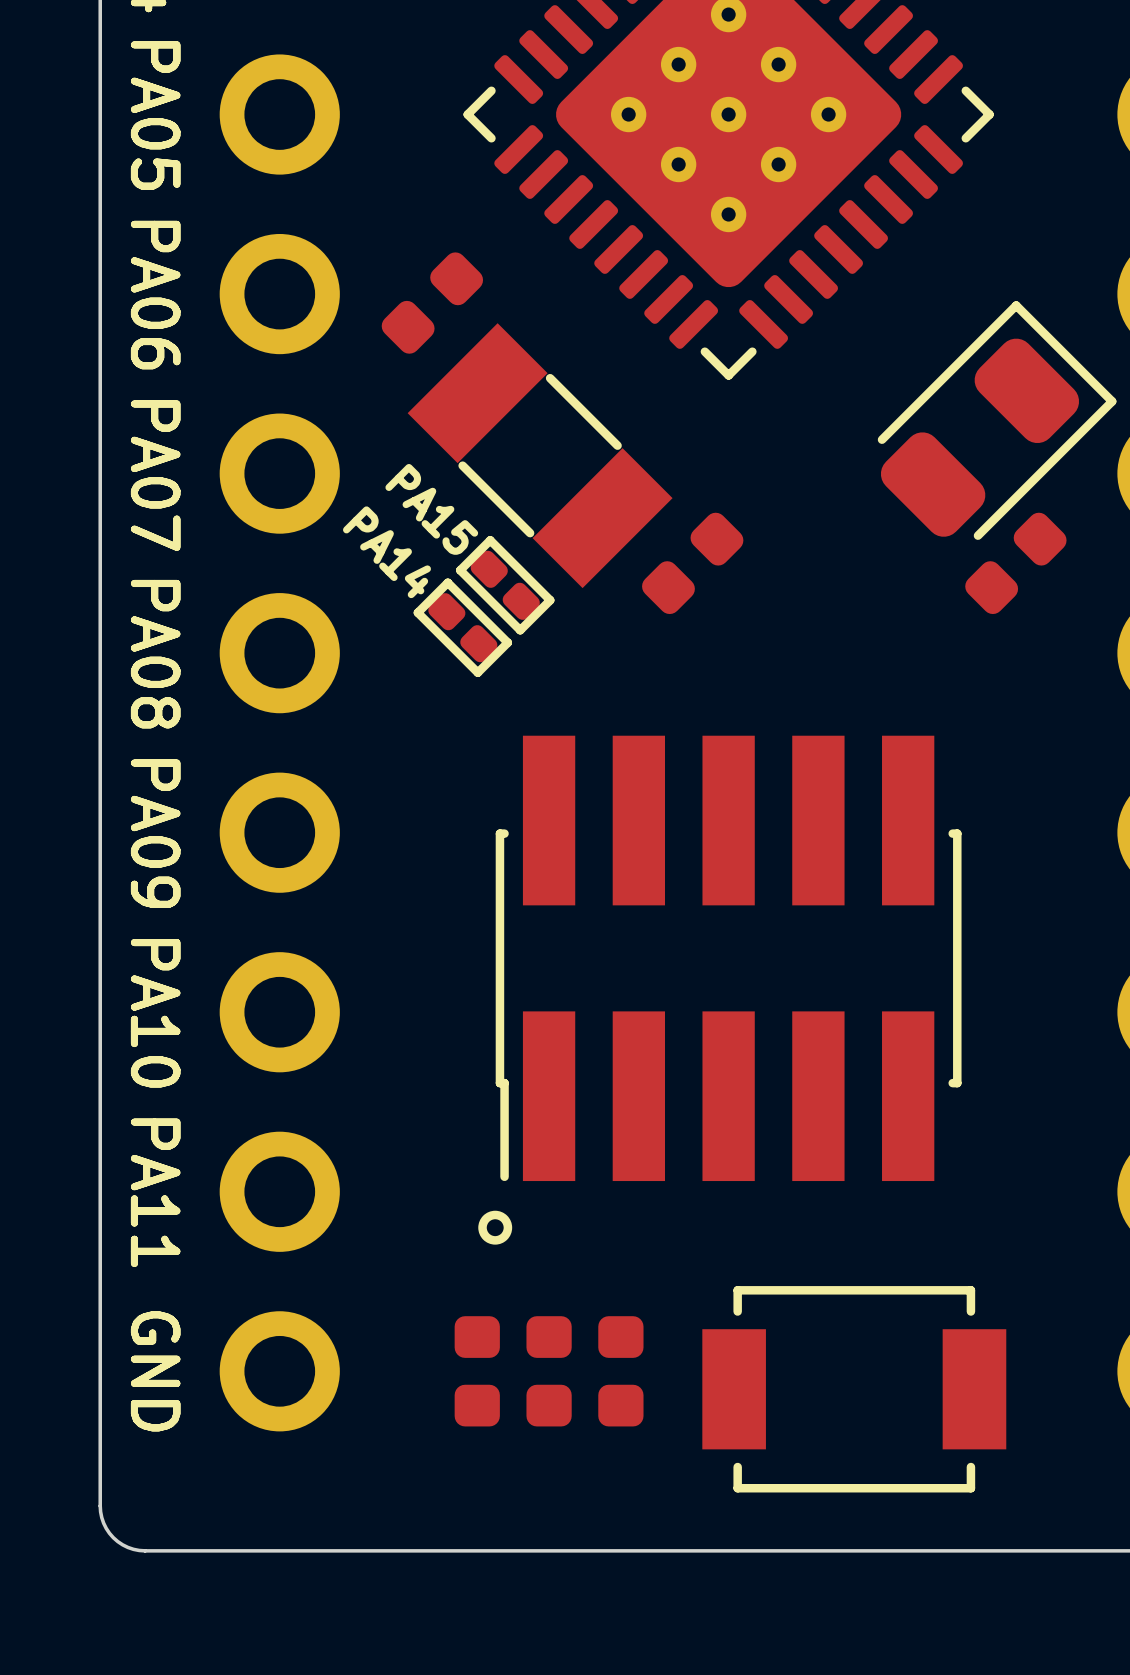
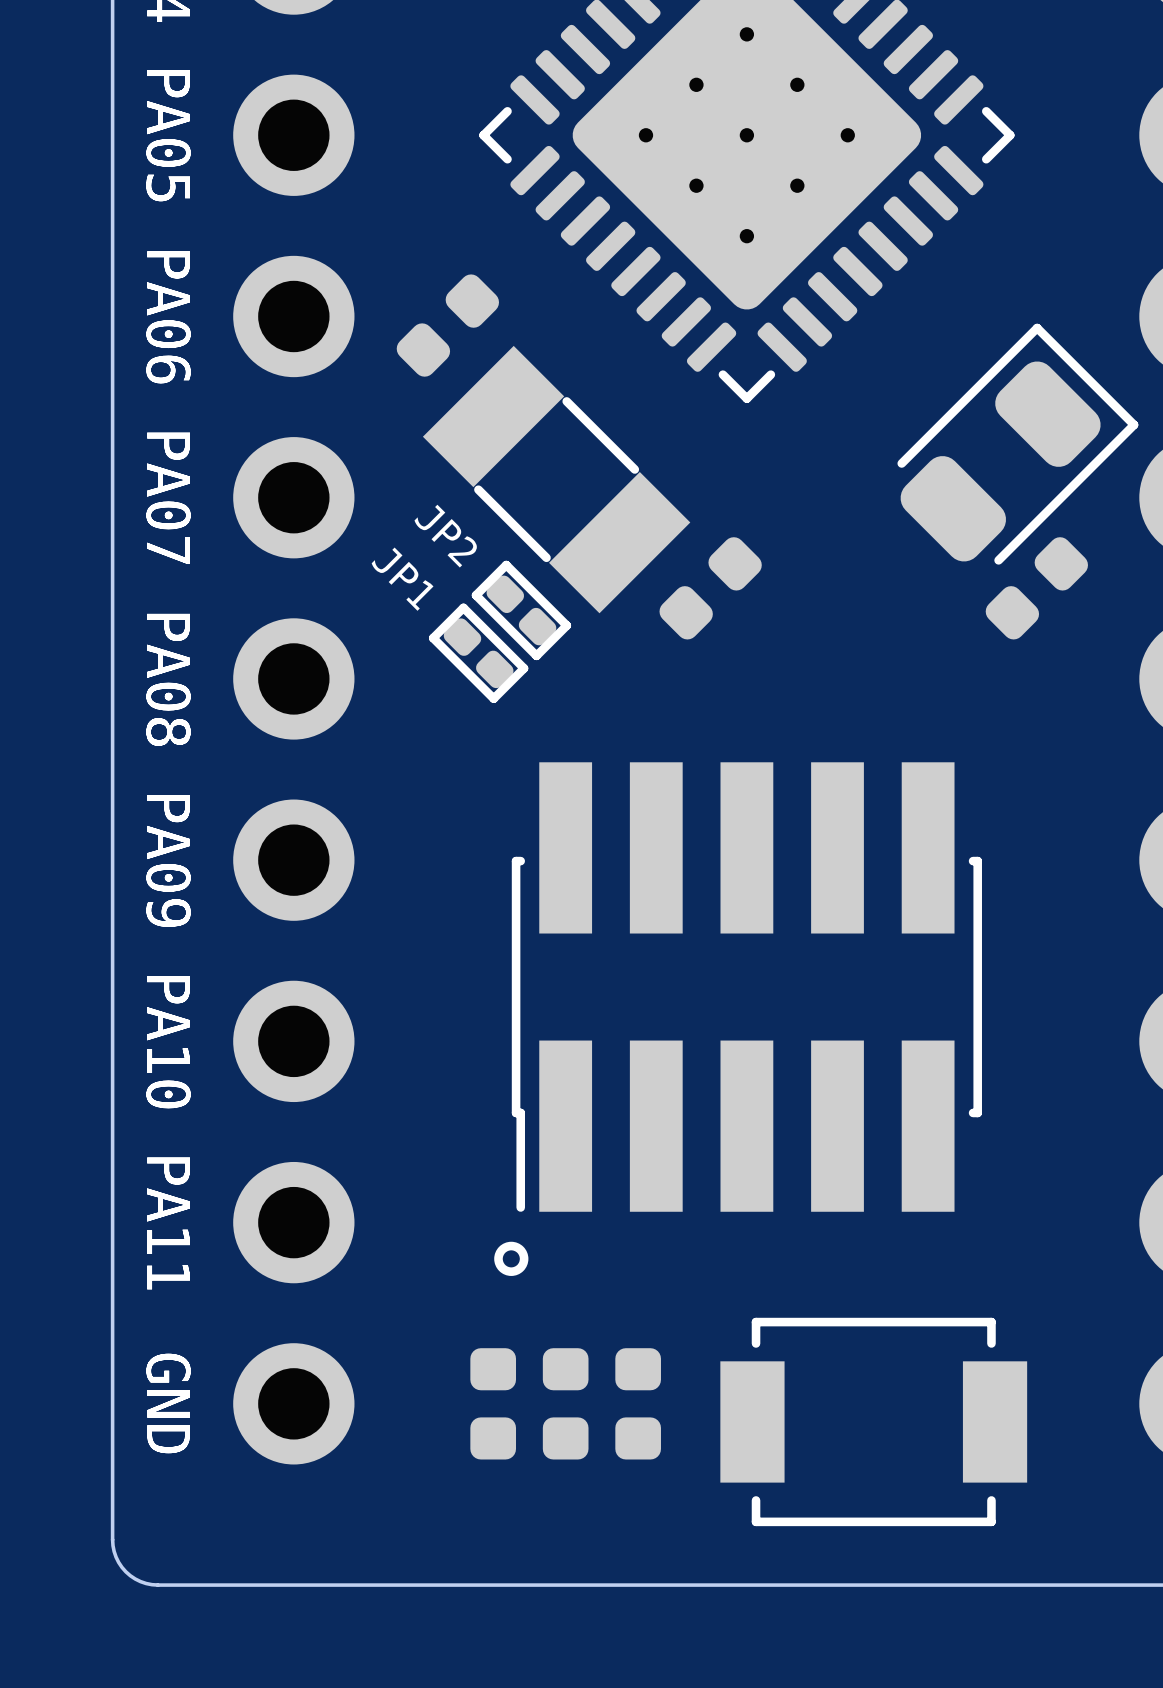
PA15 name: PA15 (431, 509) -> JP2 (445, 536)
PA14 name: PA14 (386, 552) -> JP1 (402, 579)

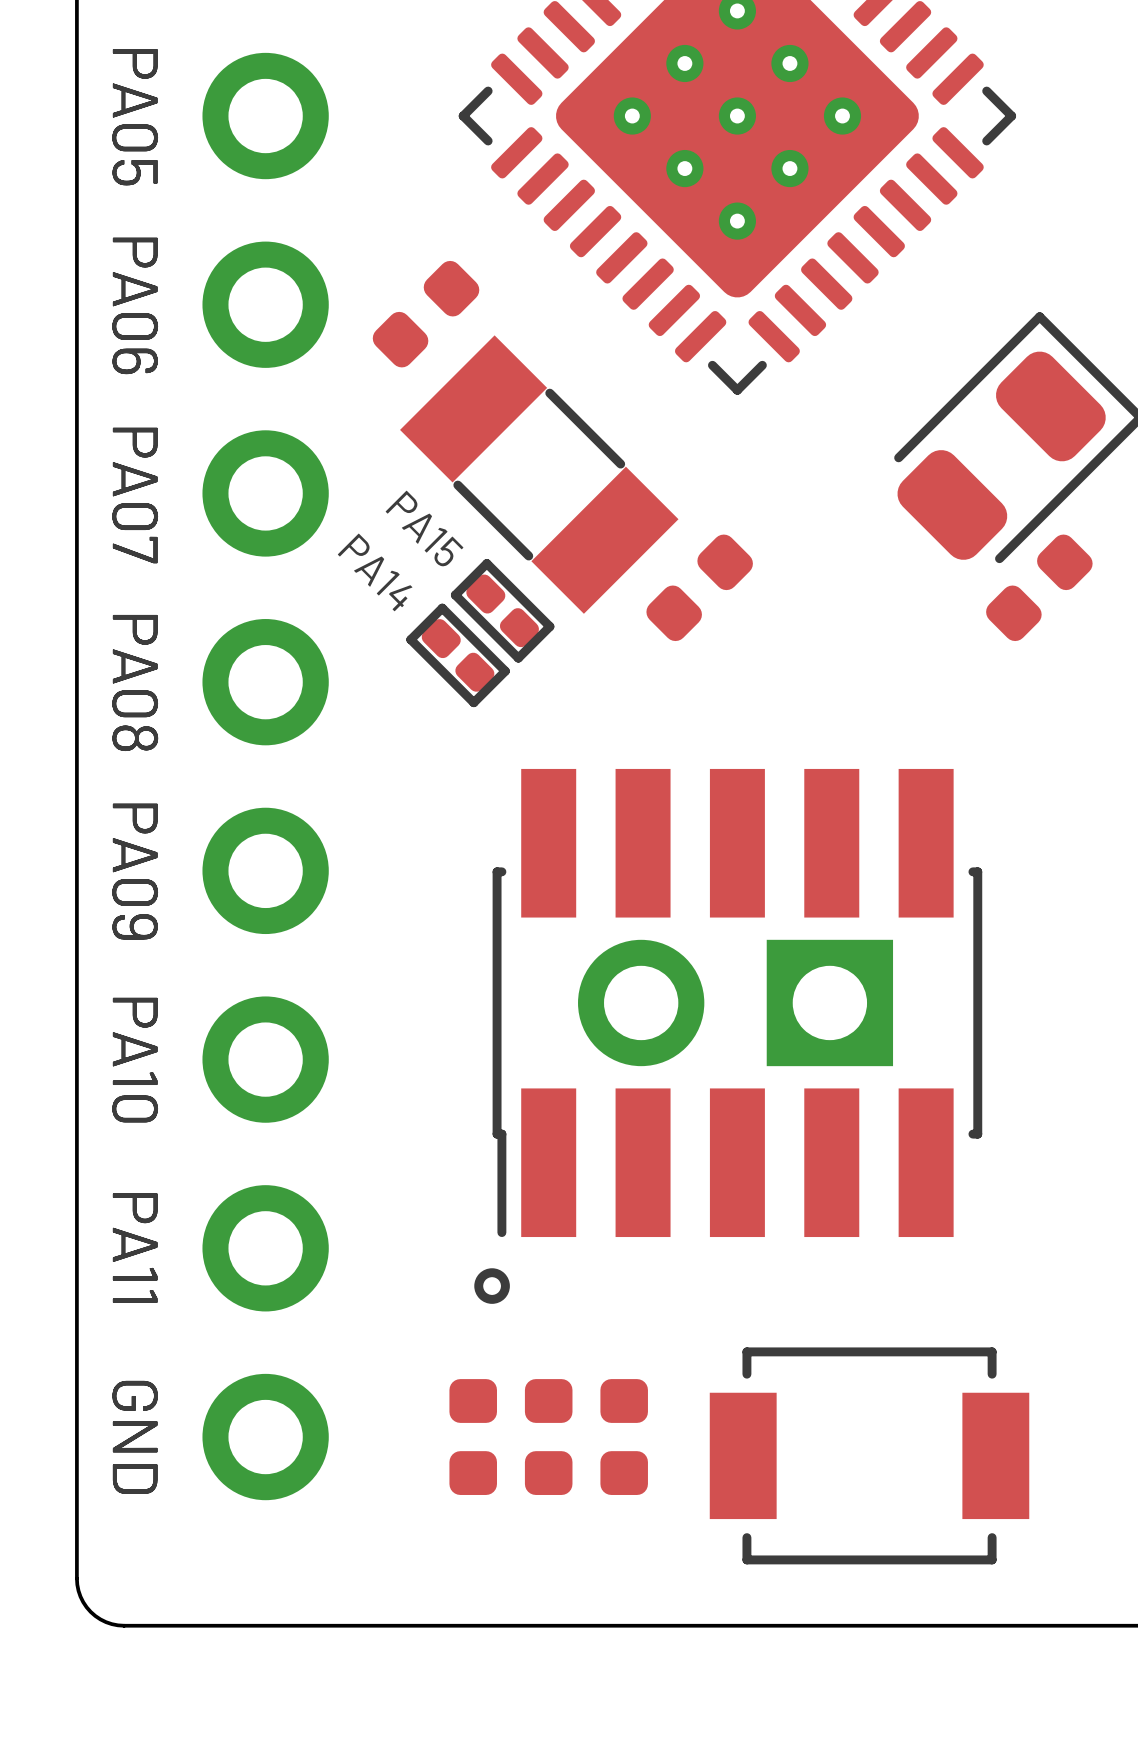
text: none -> PA15 (424, 528)
JP2 name: JP2 (445, 536) -> none
text: none -> PA14 (375, 572)
JP1 name: JP1 (402, 579) -> none
part footprint: [511, 762, 982, 1212] -> [492, 768, 983, 1238]
part: none -> (735, 1002)

